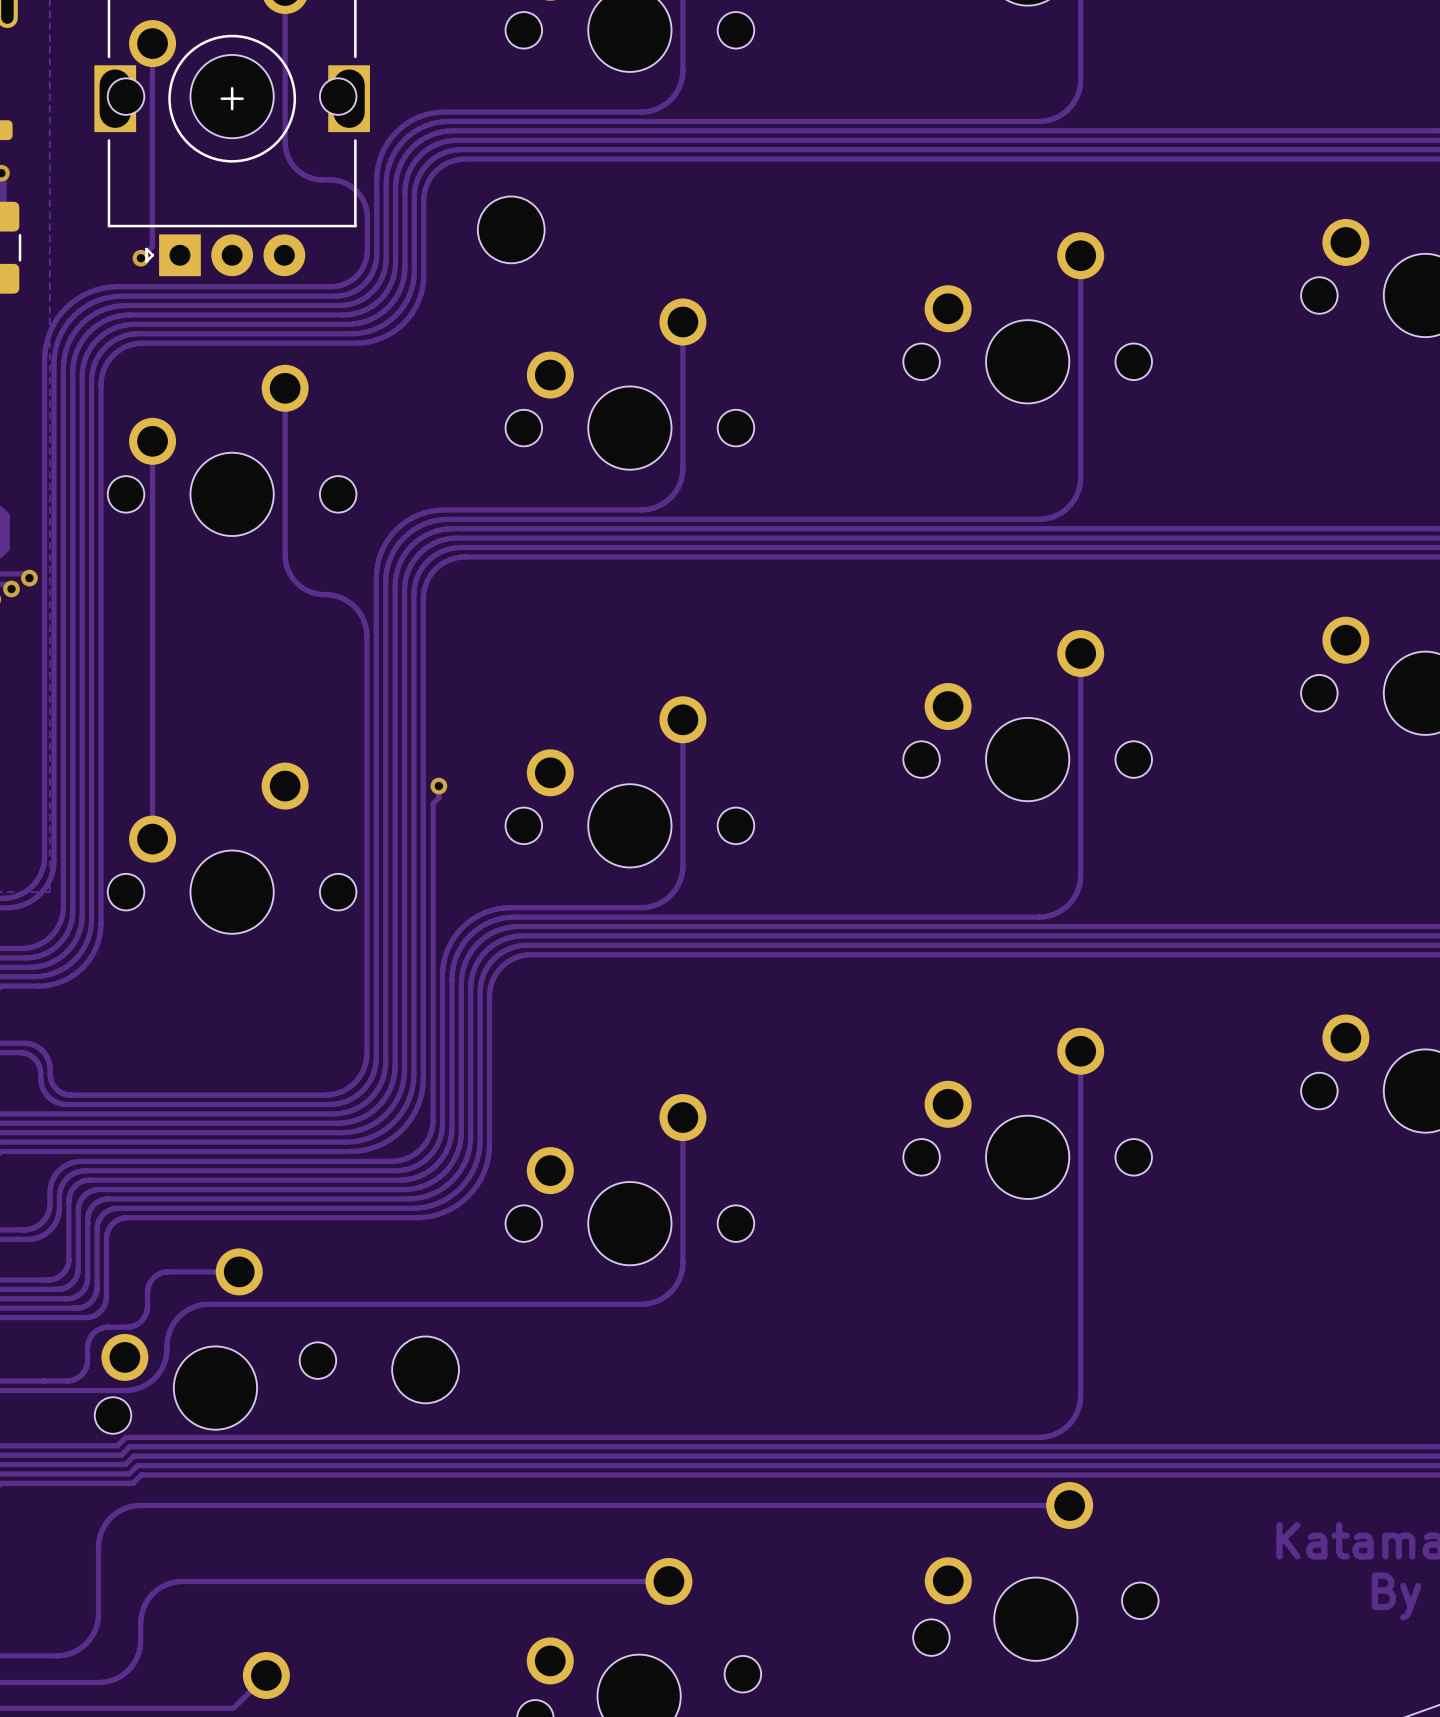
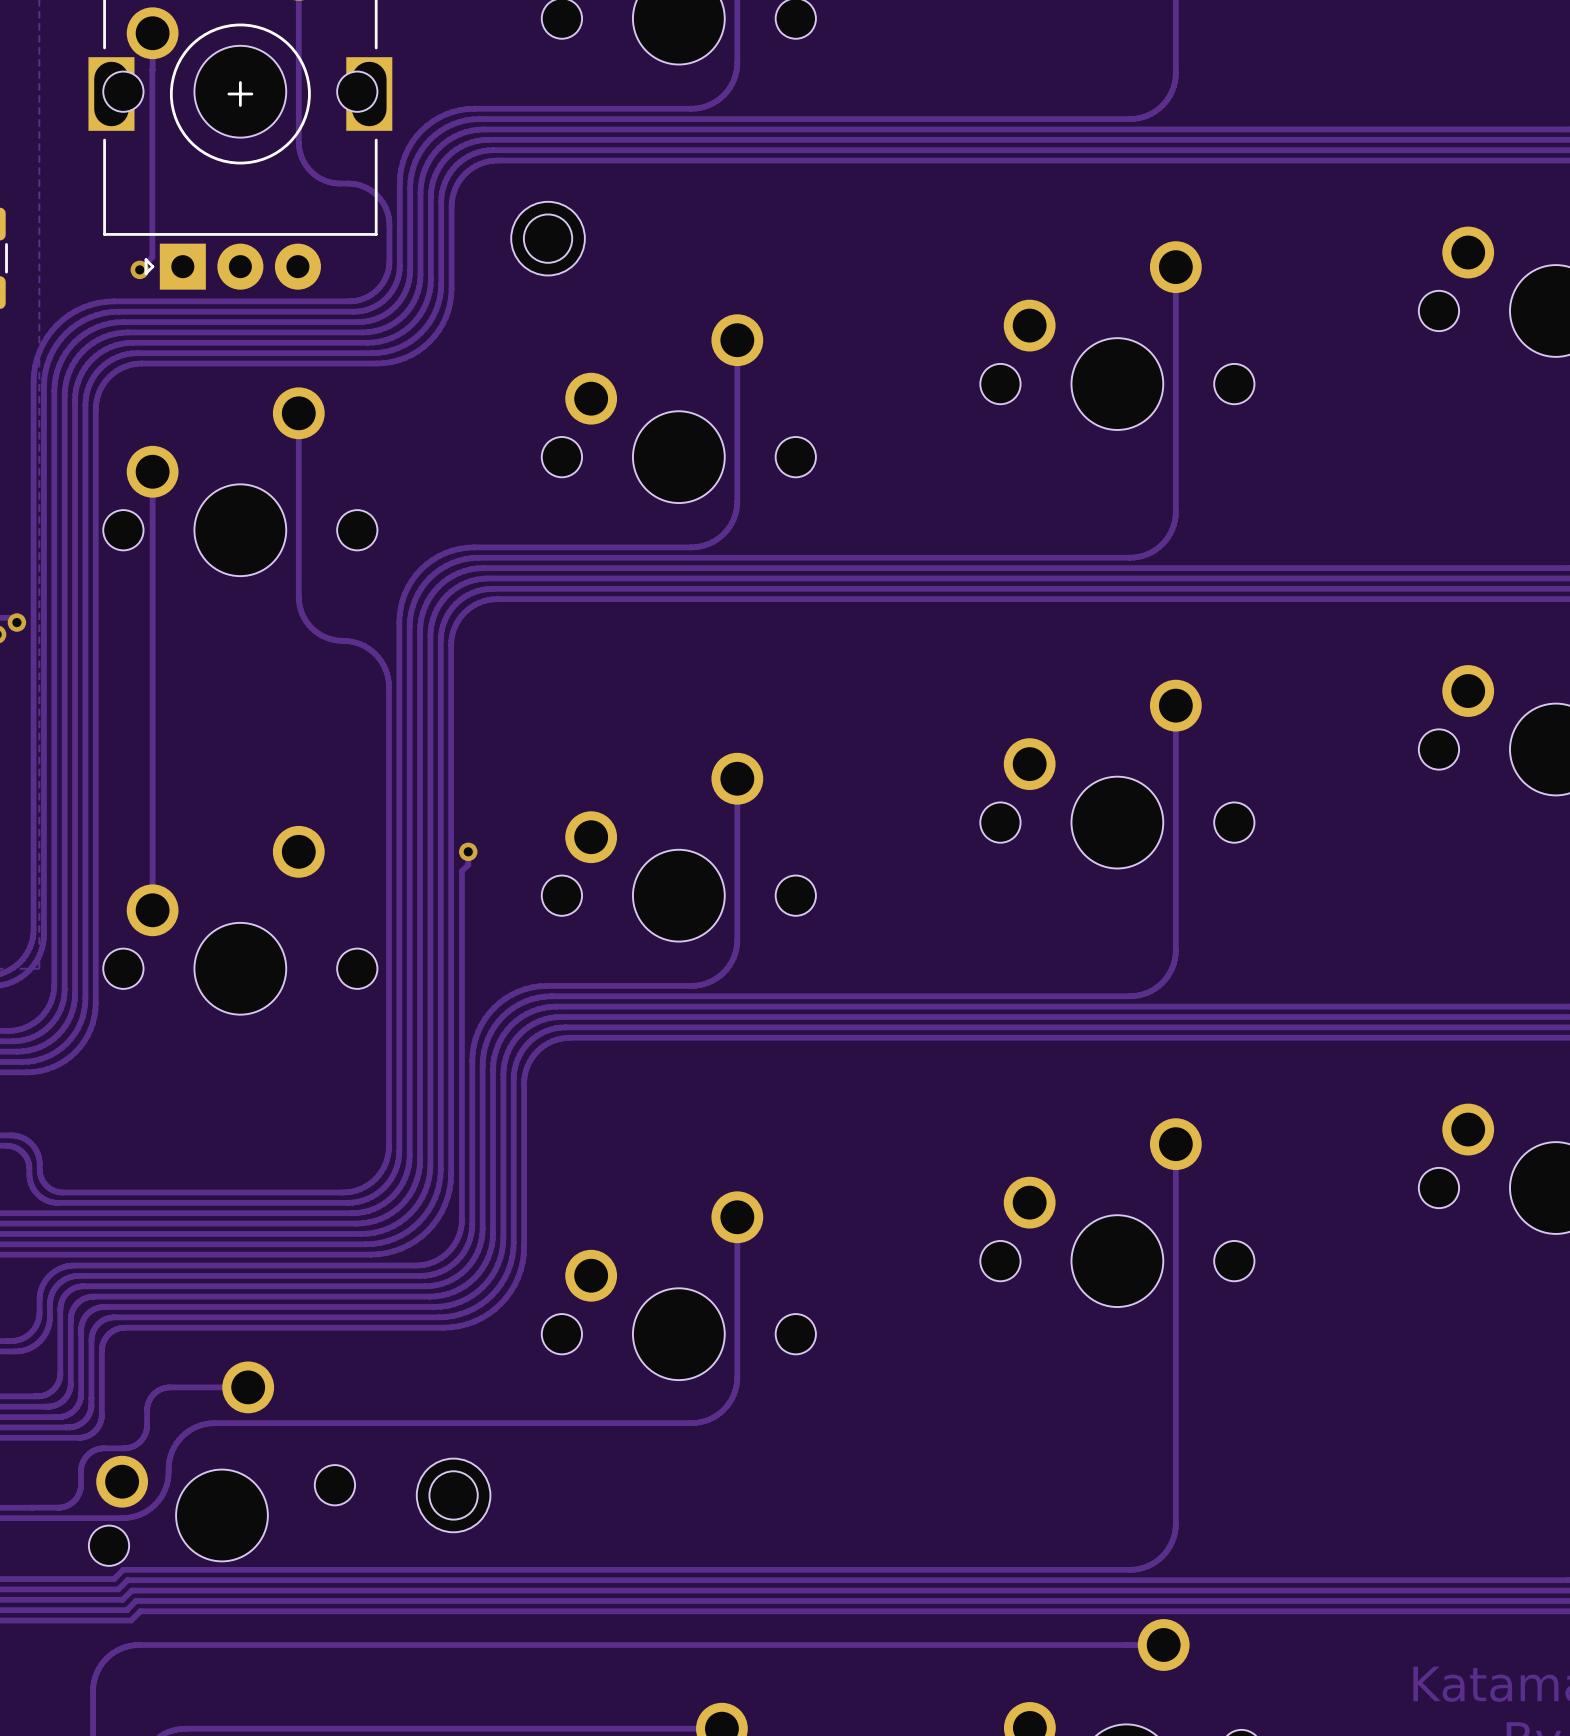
round board edge: none -> [523, 213, 573, 264]
round board edge: none -> [428, 1470, 479, 1521]

